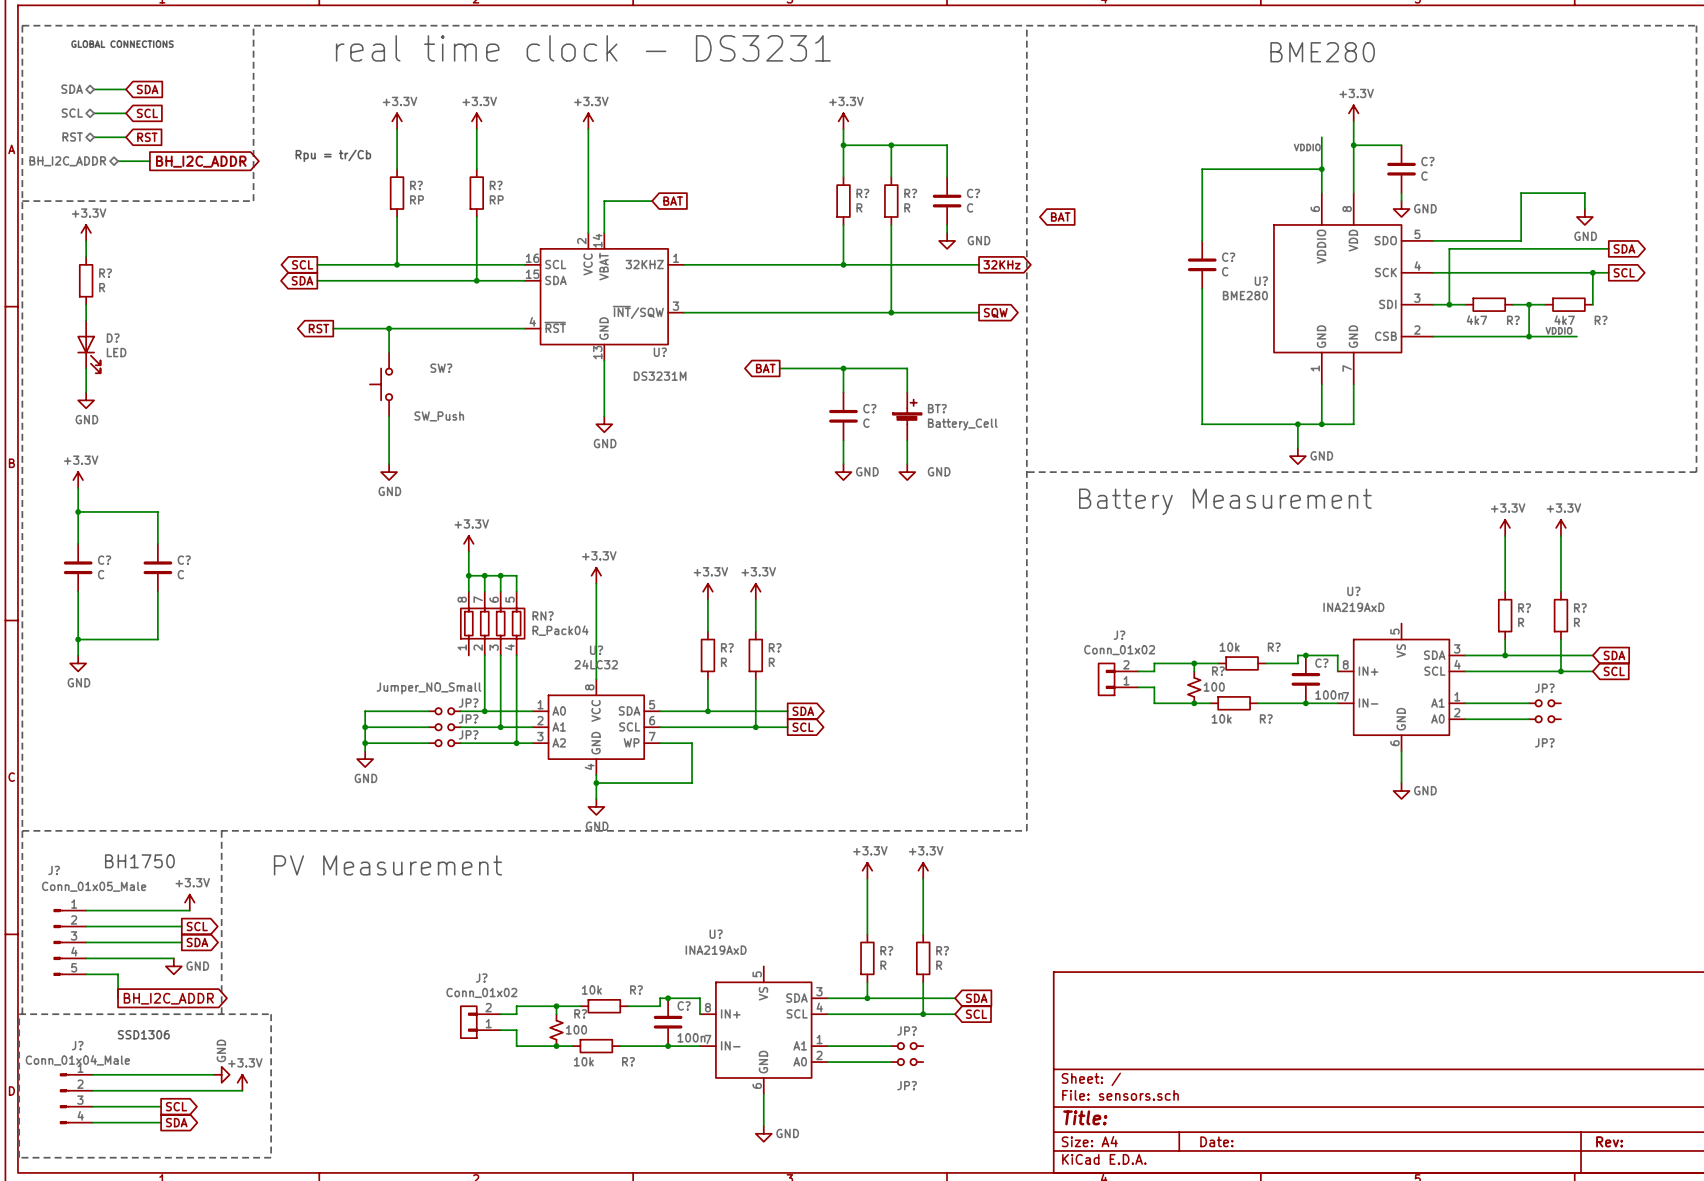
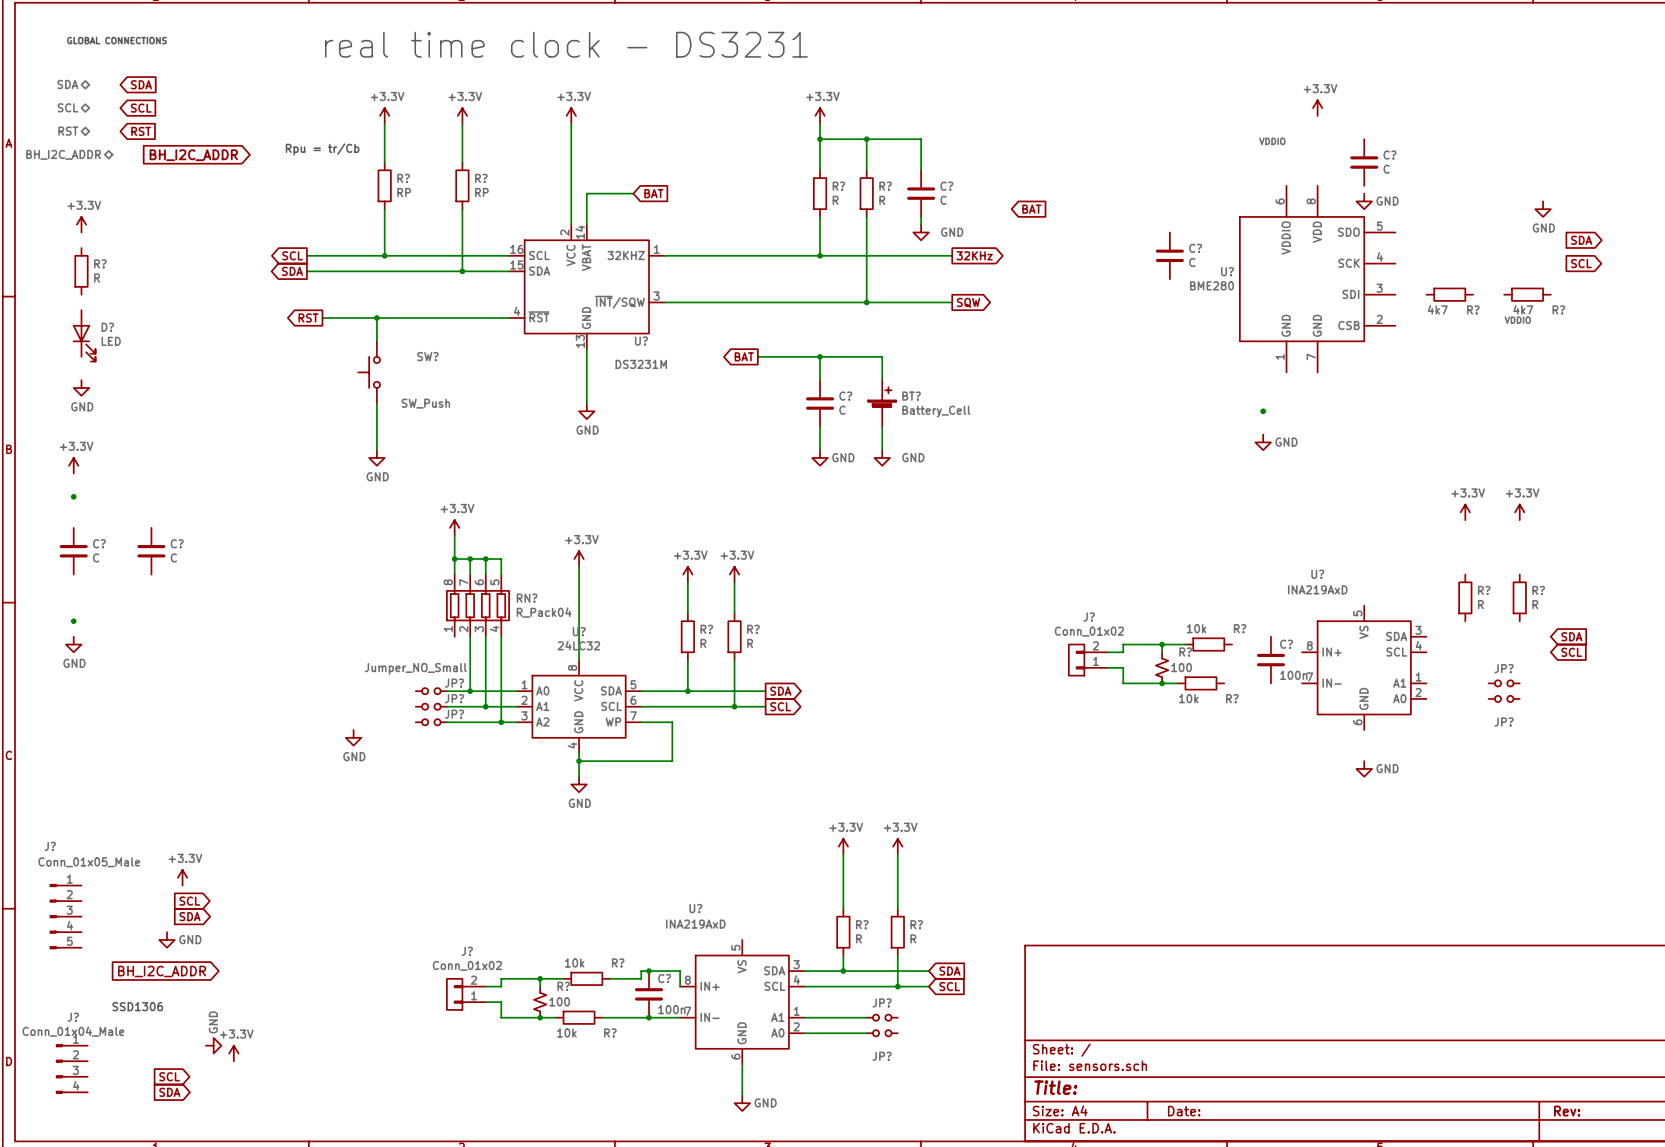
line: (253, 25) (253, 201) (22, 201) -> none
line: (1026, 25) (1026, 830) (22, 830) -> none
text: BME280 (1322, 52) -> none
wire: (94, 89) (126, 89) -> none
wire: (94, 113) (126, 113) -> none
wire: (1353, 121) (1353, 193) -> none
wire: (94, 137) (126, 137) -> none
wire: (1321, 137) (1321, 193) -> none
wire: (1353, 145) (1401, 145) -> none
junction: (1353, 145) -> none
wire: (118, 161) (149, 161) -> none
wire: (1321, 169) (1202, 169) (1202, 240) -> none
junction: (1321, 169) -> none
wire: (1401, 193) (1401, 201) -> none
wire: (1584, 209) (1584, 193) (1521, 193) (1521, 240) (1433, 240) -> none
wire: (86, 240) (86, 256) -> none
wire: (1608, 248) (1449, 248) (1449, 304) -> none
wire: (1433, 272) (1608, 272) -> none
wire: (1592, 272) (1592, 304) -> none
junction: (1592, 272) -> none
wire: (1202, 288) (1202, 424) (1353, 424) (1353, 384) -> none
wire: (86, 304) (86, 320) -> none
wire: (1433, 304) (1465, 304) -> none
junction: (1449, 304) -> none
wire: (1513, 304) (1545, 304) -> none
wire: (1529, 304) (1529, 336) -> none
junction: (1529, 304) -> none
wire: (1433, 336) (1576, 336) -> none
junction: (1529, 336) -> none
wire: (86, 368) (86, 392) -> none
wire: (1321, 384) (1321, 424) -> none
wire: (1297, 424) (1297, 448) -> none
junction: (1321, 424) -> none
line: (1026, 472) (1696, 472) (1696, 25) (22, 25) (22, 1014) -> none
wire: (78, 488) (78, 543) -> none
text: Battery Measurement (1225, 501) -> none
wire: (78, 511) (157, 511) (157, 543) -> none
wire: (1505, 535) (1505, 591) -> none
wire: (1560, 535) (1560, 591) -> none
wire: (78, 591) (78, 655) -> none
wire: (157, 591) (157, 639) (78, 639) -> none
wire: (1505, 639) (1505, 655) -> none
wire: (1560, 639) (1560, 671) -> none
junction: (1305, 655) -> none
wire: (1465, 655) (1592, 655) -> none
junction: (1505, 655) -> none
wire: (1266, 663) (1297, 663) (1297, 655) (1337, 655) (1337, 671) -> none
wire: (1465, 671) (1592, 671) -> none
junction: (1560, 671) -> none
wire: (1258, 703) (1337, 703) -> none
junction: (1305, 703) -> none
wire: (1465, 703) (1529, 703) -> none
wire: (428, 711) (365, 711) (365, 751) -> none
wire: (1465, 719) (1529, 719) -> none
wire: (365, 727) (428, 727) -> none
junction: (365, 727) -> none
wire: (365, 743) (428, 743) -> none
junction: (365, 743) -> none
wire: (1401, 751) (1401, 783) -> none
line: (221, 830) (221, 1014) -> none
text: BH1750 (139, 861) -> none
text: PV Measurement (387, 865) -> none
wire: (86, 910) (189, 910) -> none
wire: (86, 926) (181, 926) -> none
wire: (86, 942) (181, 942) -> none
wire: (86, 958) (173, 958) -> none
wire: (86, 974) (118, 974) (118, 998) -> none
line: (19, 1014) (19, 1157) (271, 1157) (271, 1014) (19, 1014) -> none
wire: (92, 1074) (213, 1074) -> none
wire: (92, 1090) (242, 1090) -> none
wire: (92, 1106) (161, 1106) -> none
wire: (92, 1122) (161, 1122) -> none

